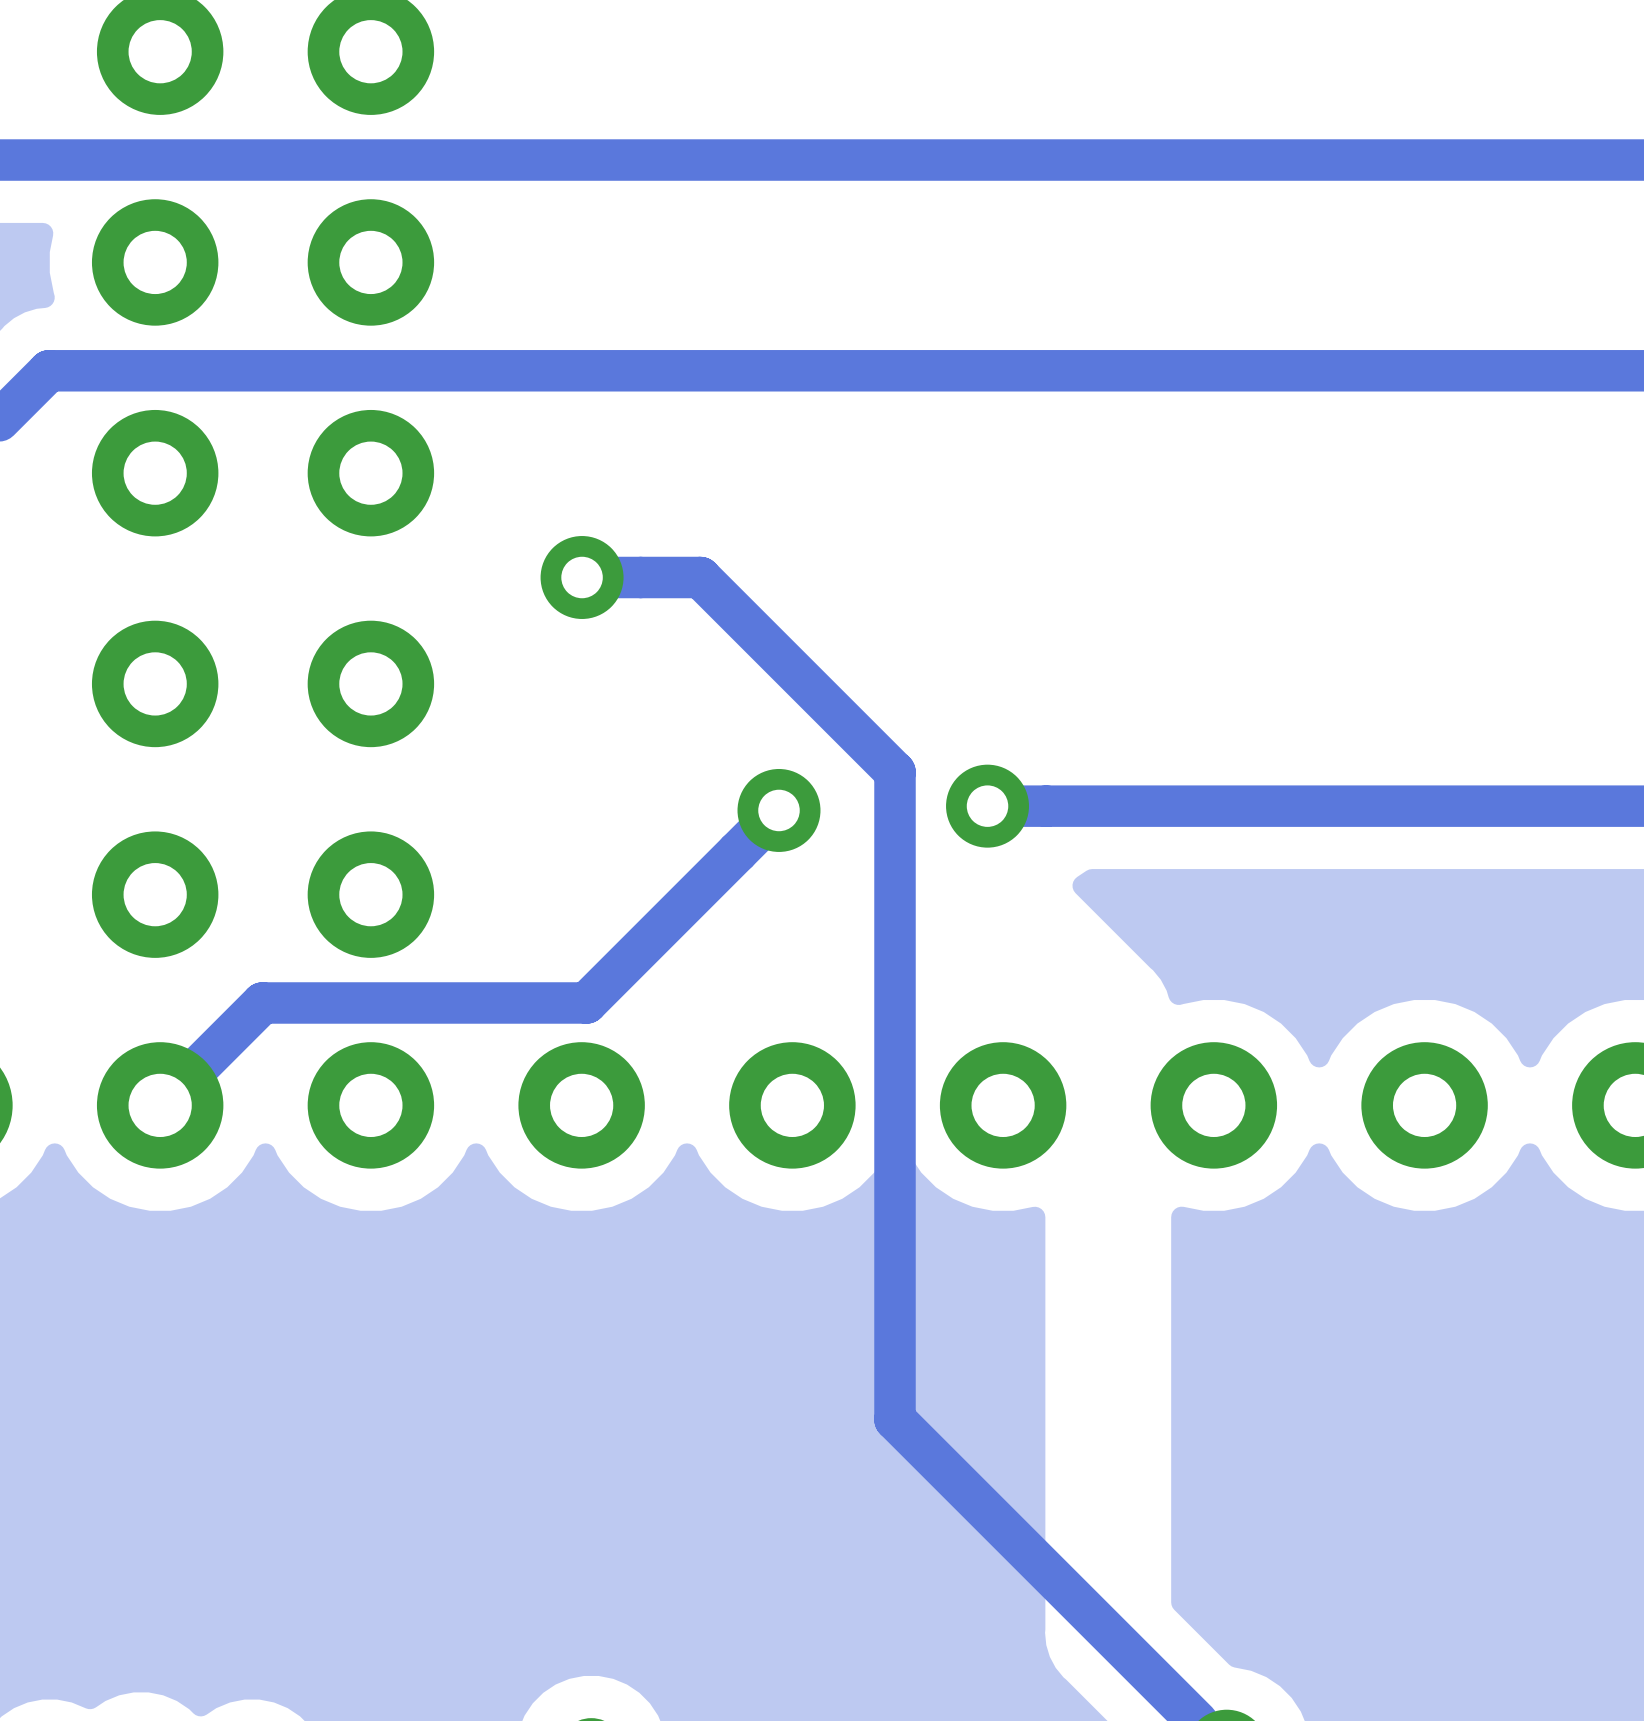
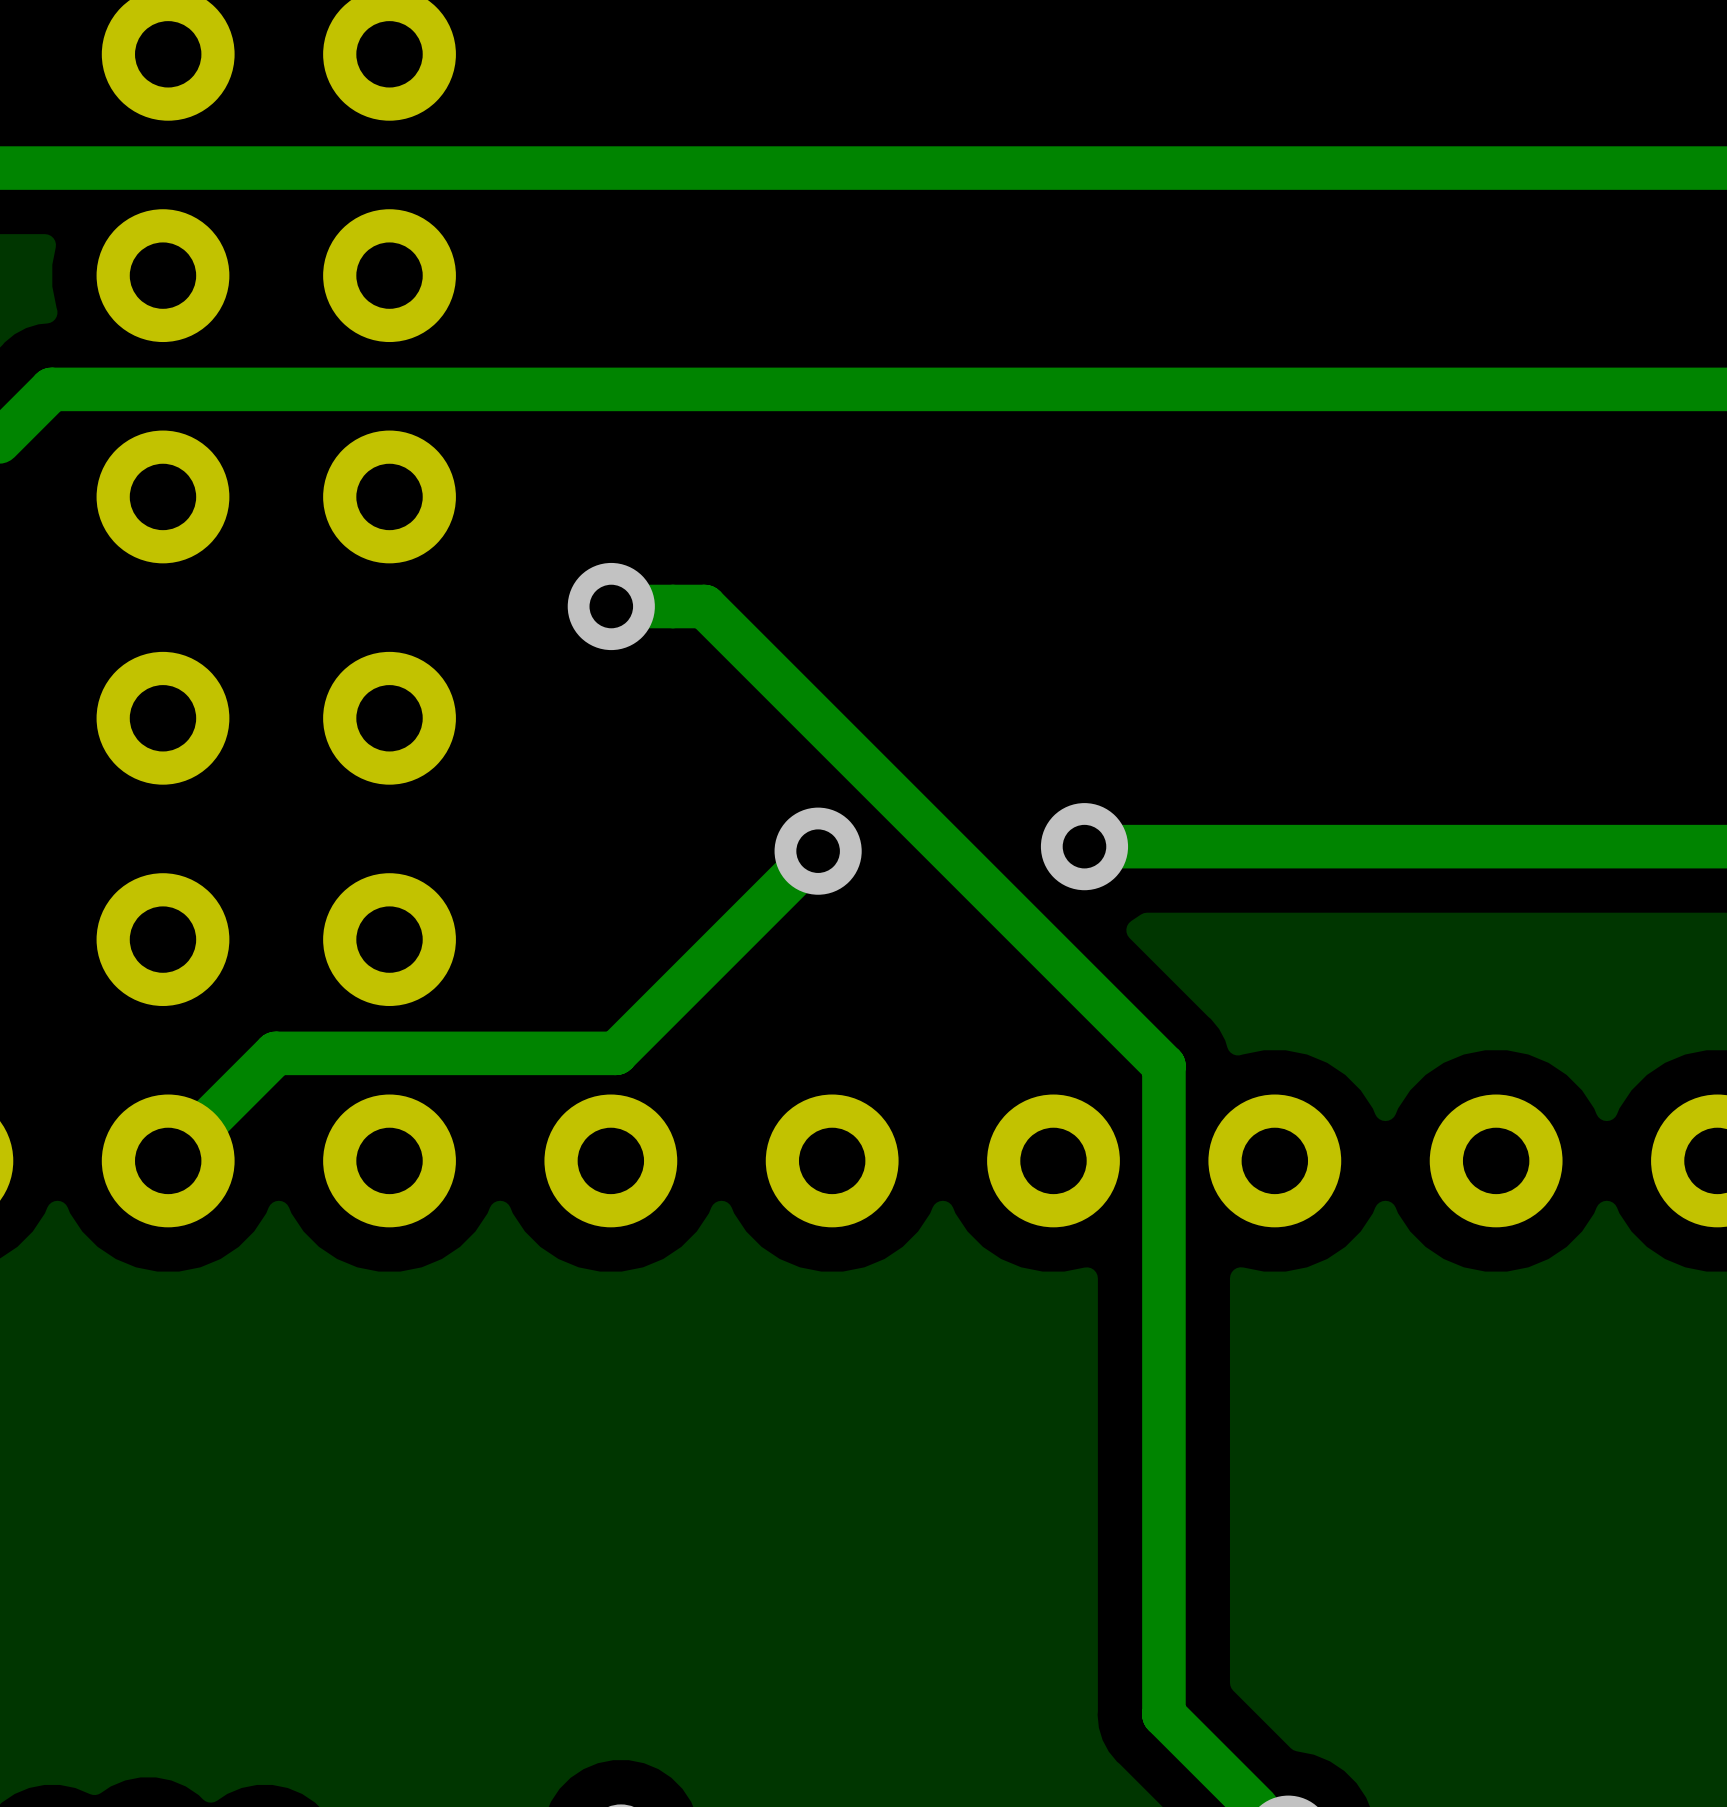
track: (670, 577) (700, 577) (895, 772) (895, 1419) (1108, 1632) -> (704, 606) (1163, 1065) (1163, 1714)
via position: (987, 806) -> (1084, 846)

